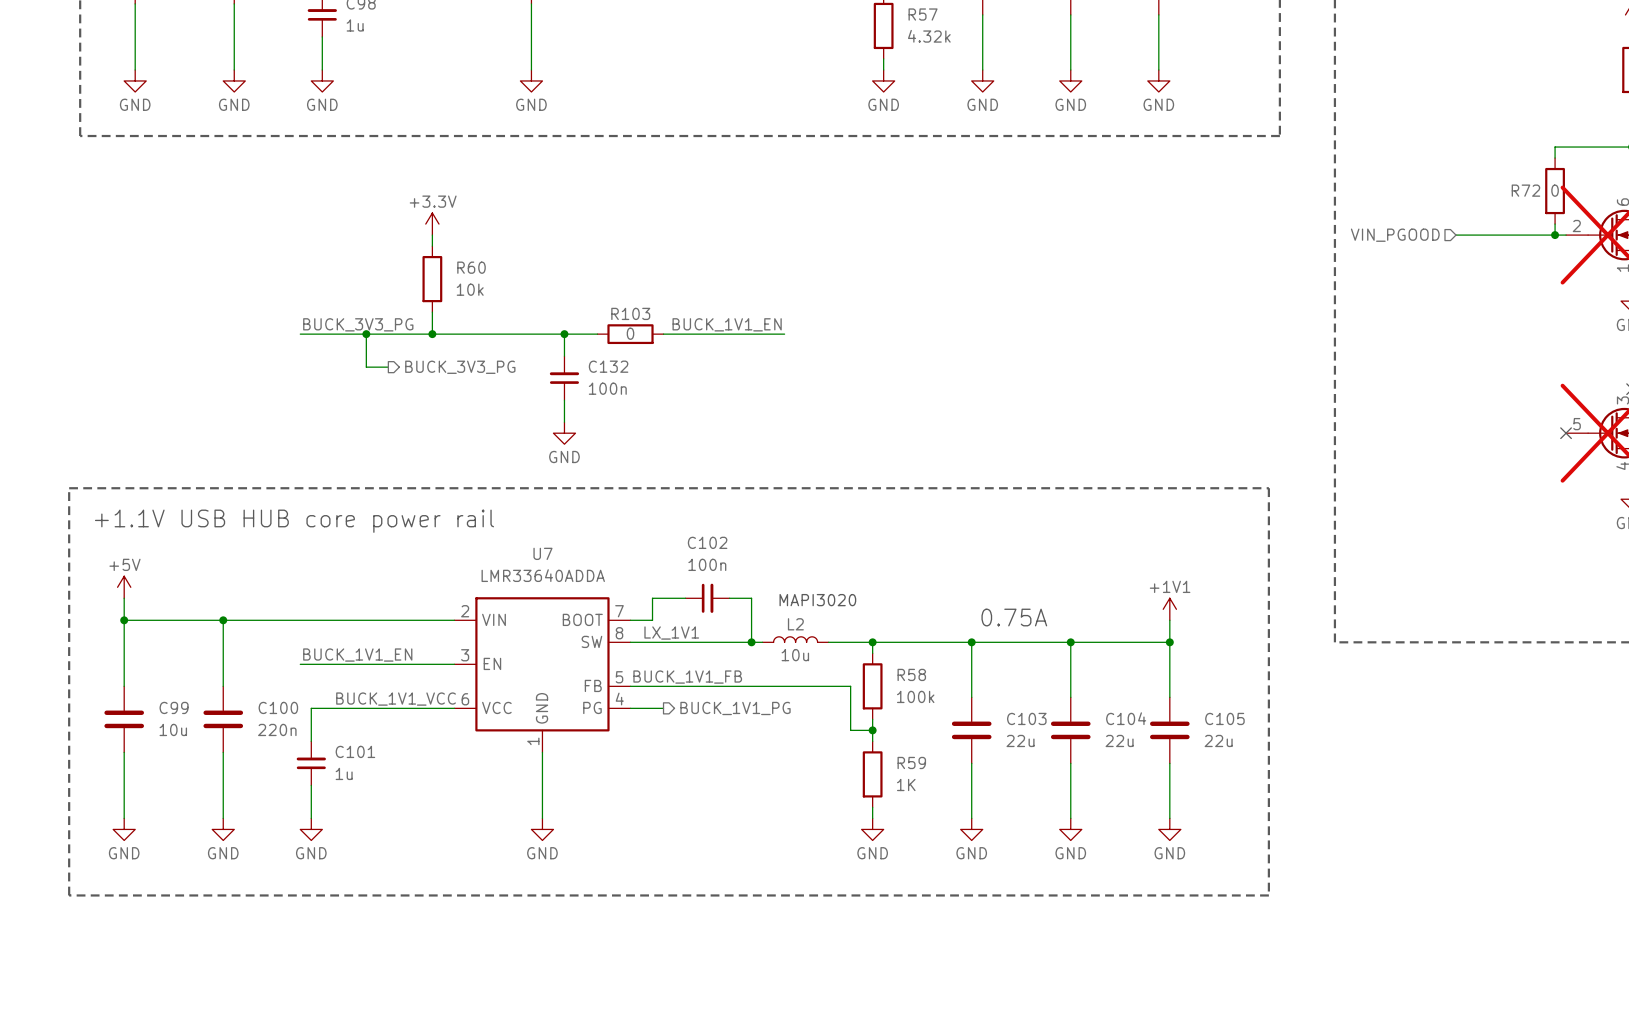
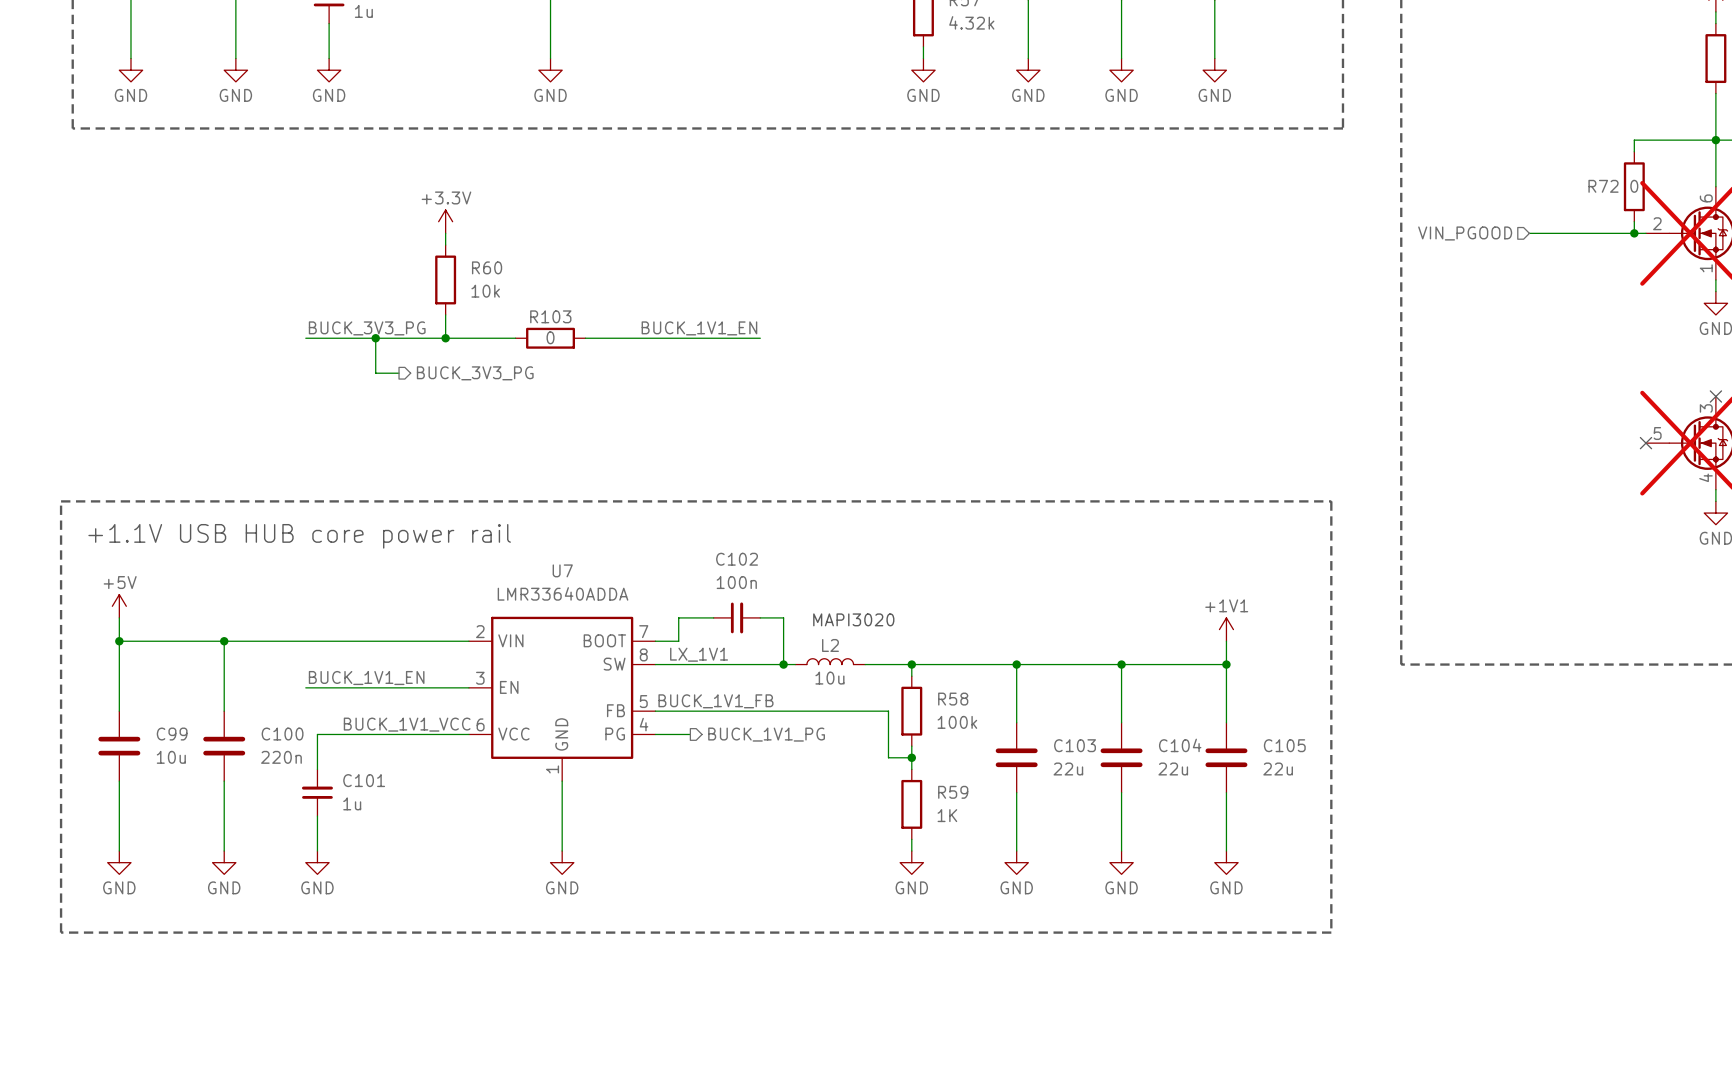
label position: BUCK_1V1_EN (727, 324) -> BUCK_1V1_EN (699, 328)
wire: (498, 334) (564, 334) (564, 356) -> none
junction: (564, 334) -> none
wire: none -> (620, 338) (690, 338)
R103 position: (630, 334) -> (550, 338)
wire: (729, 334) (784, 334) -> none
C132: 100n (564, 378) -> none
wire: (564, 400) (564, 422) -> none
power symbol: GND (564, 433) -> none
text: 0.75A (1014, 617) -> none

